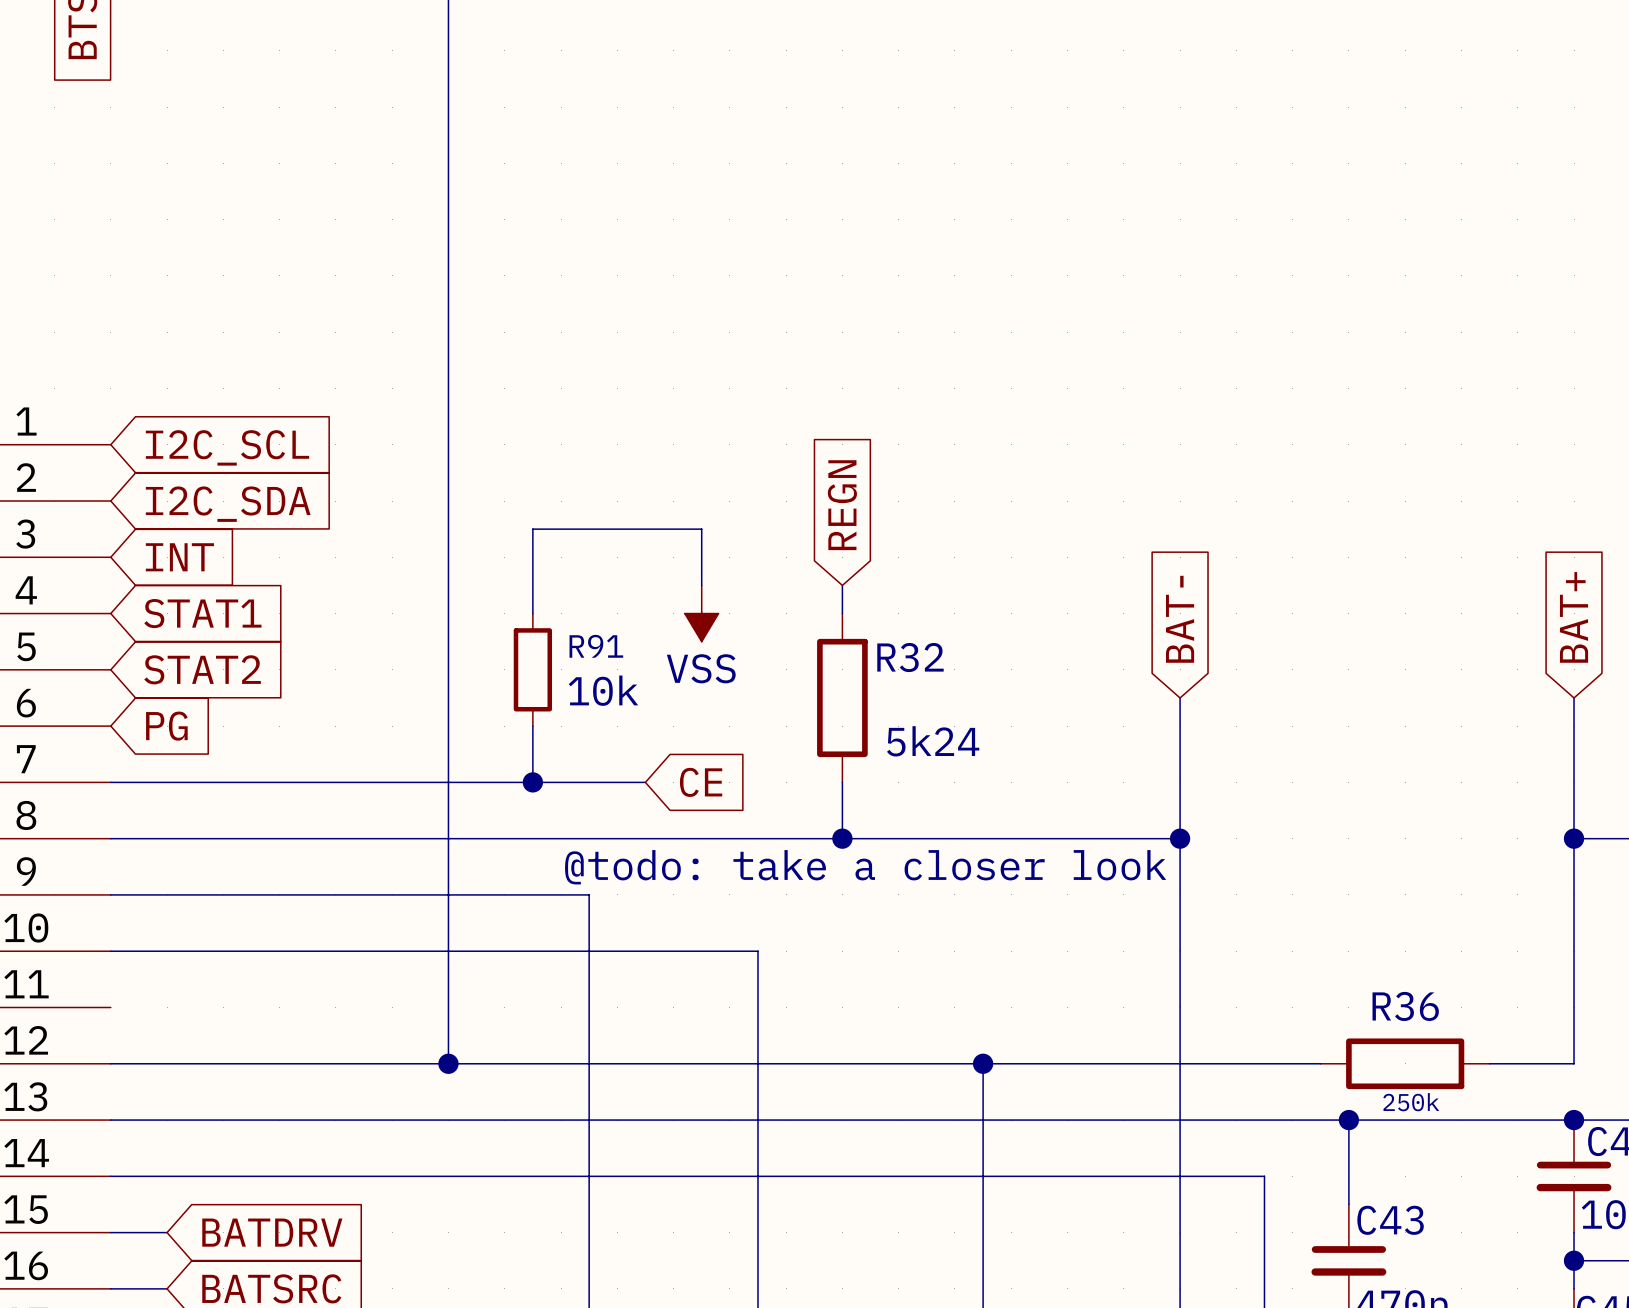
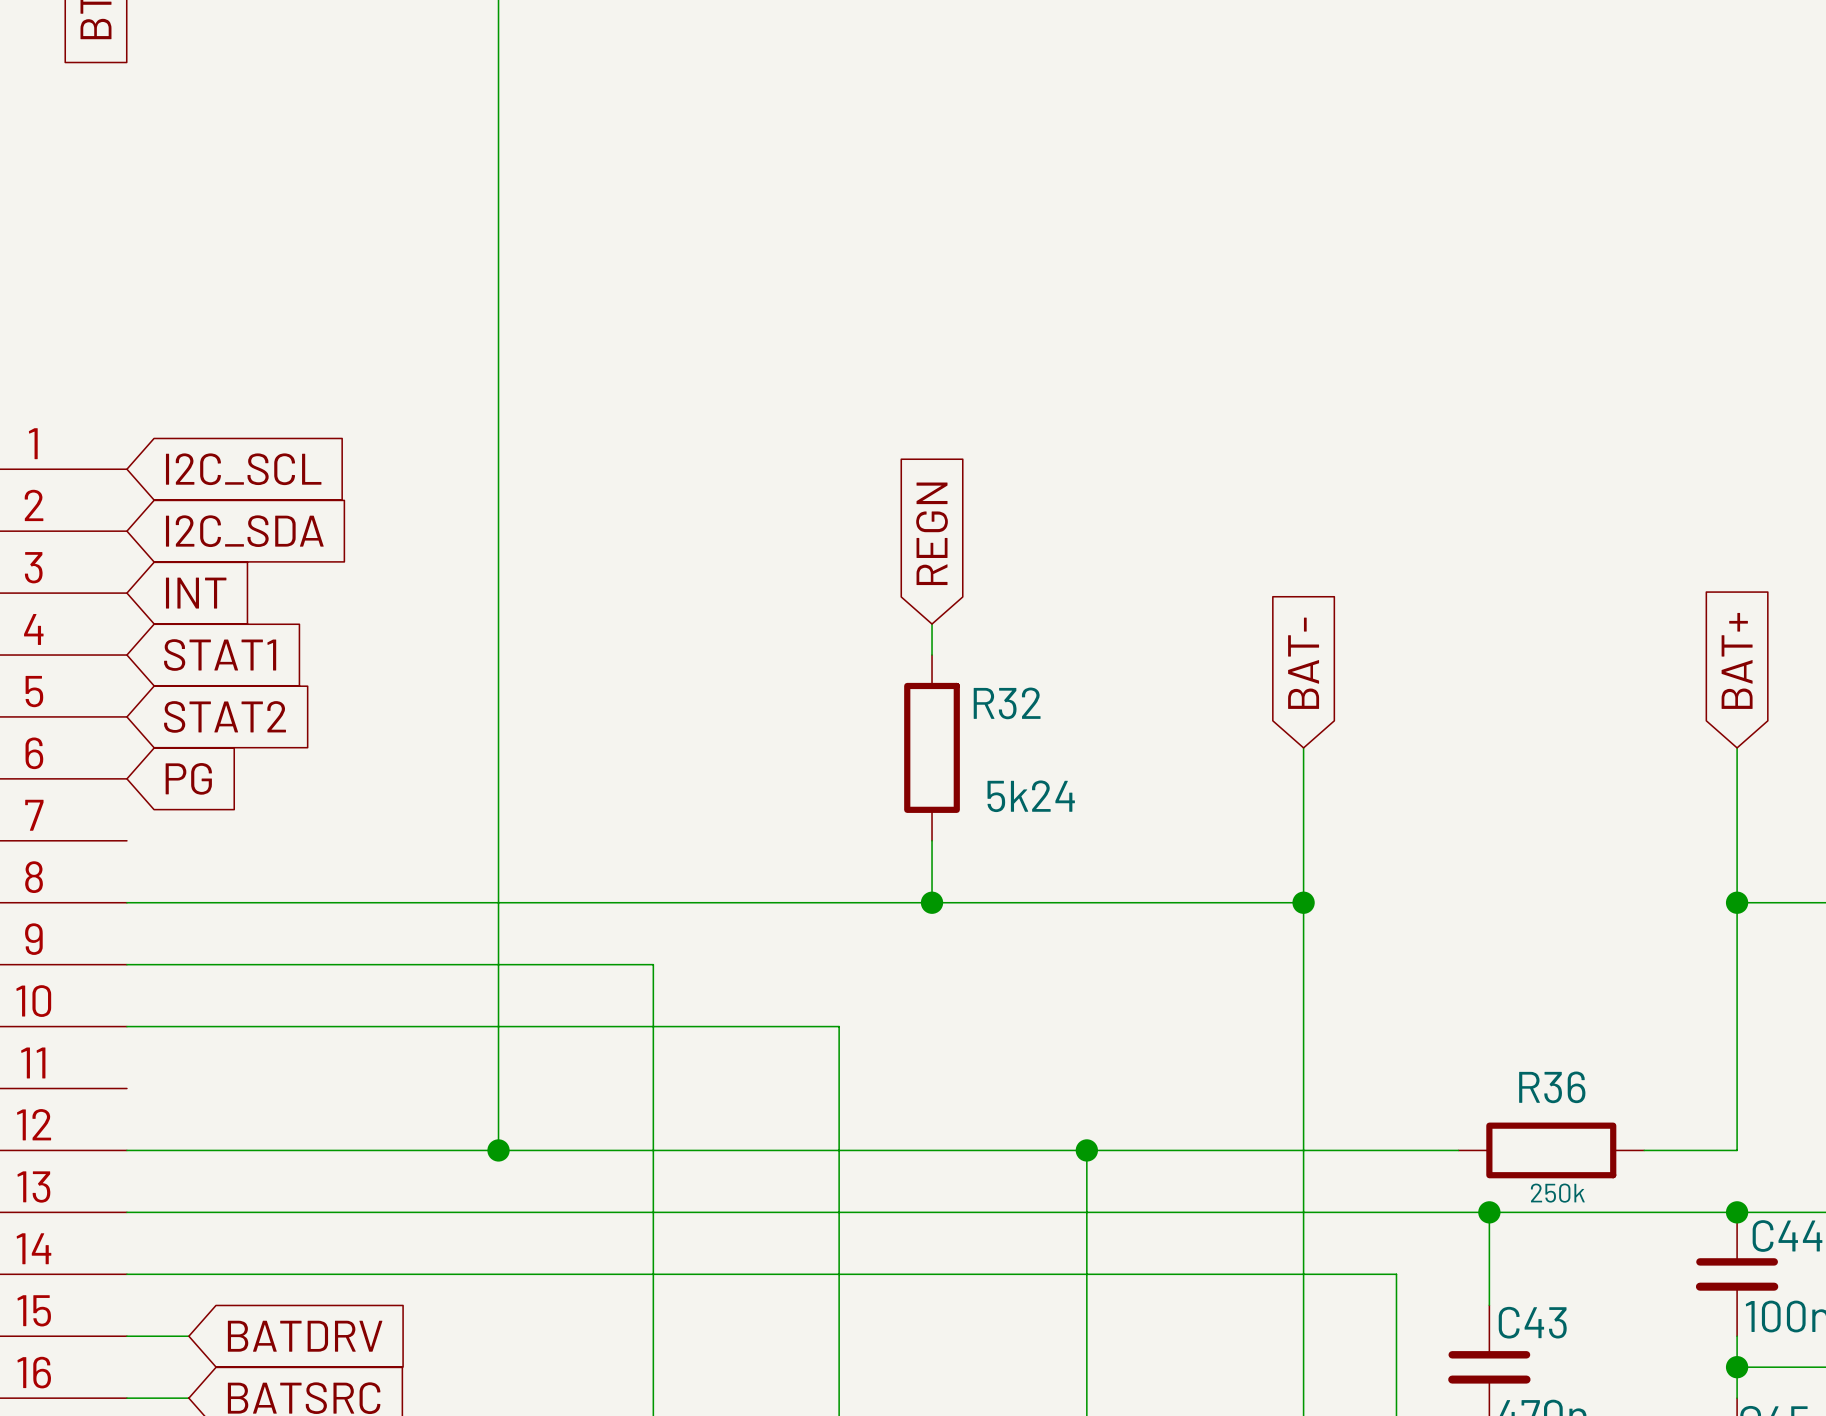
wire: (701, 585) (701, 529) (532, 529) (532, 613) -> none
power symbol: VSS (701, 613) -> none
R91: 10k (532, 669) -> none
wire: (532, 726) (532, 782) -> none
wire: (110, 782) (645, 782) -> none
junction: (532, 782) -> none
global label: CE (701, 782) -> none
text: @todo: take a closer look (865, 867) -> none

